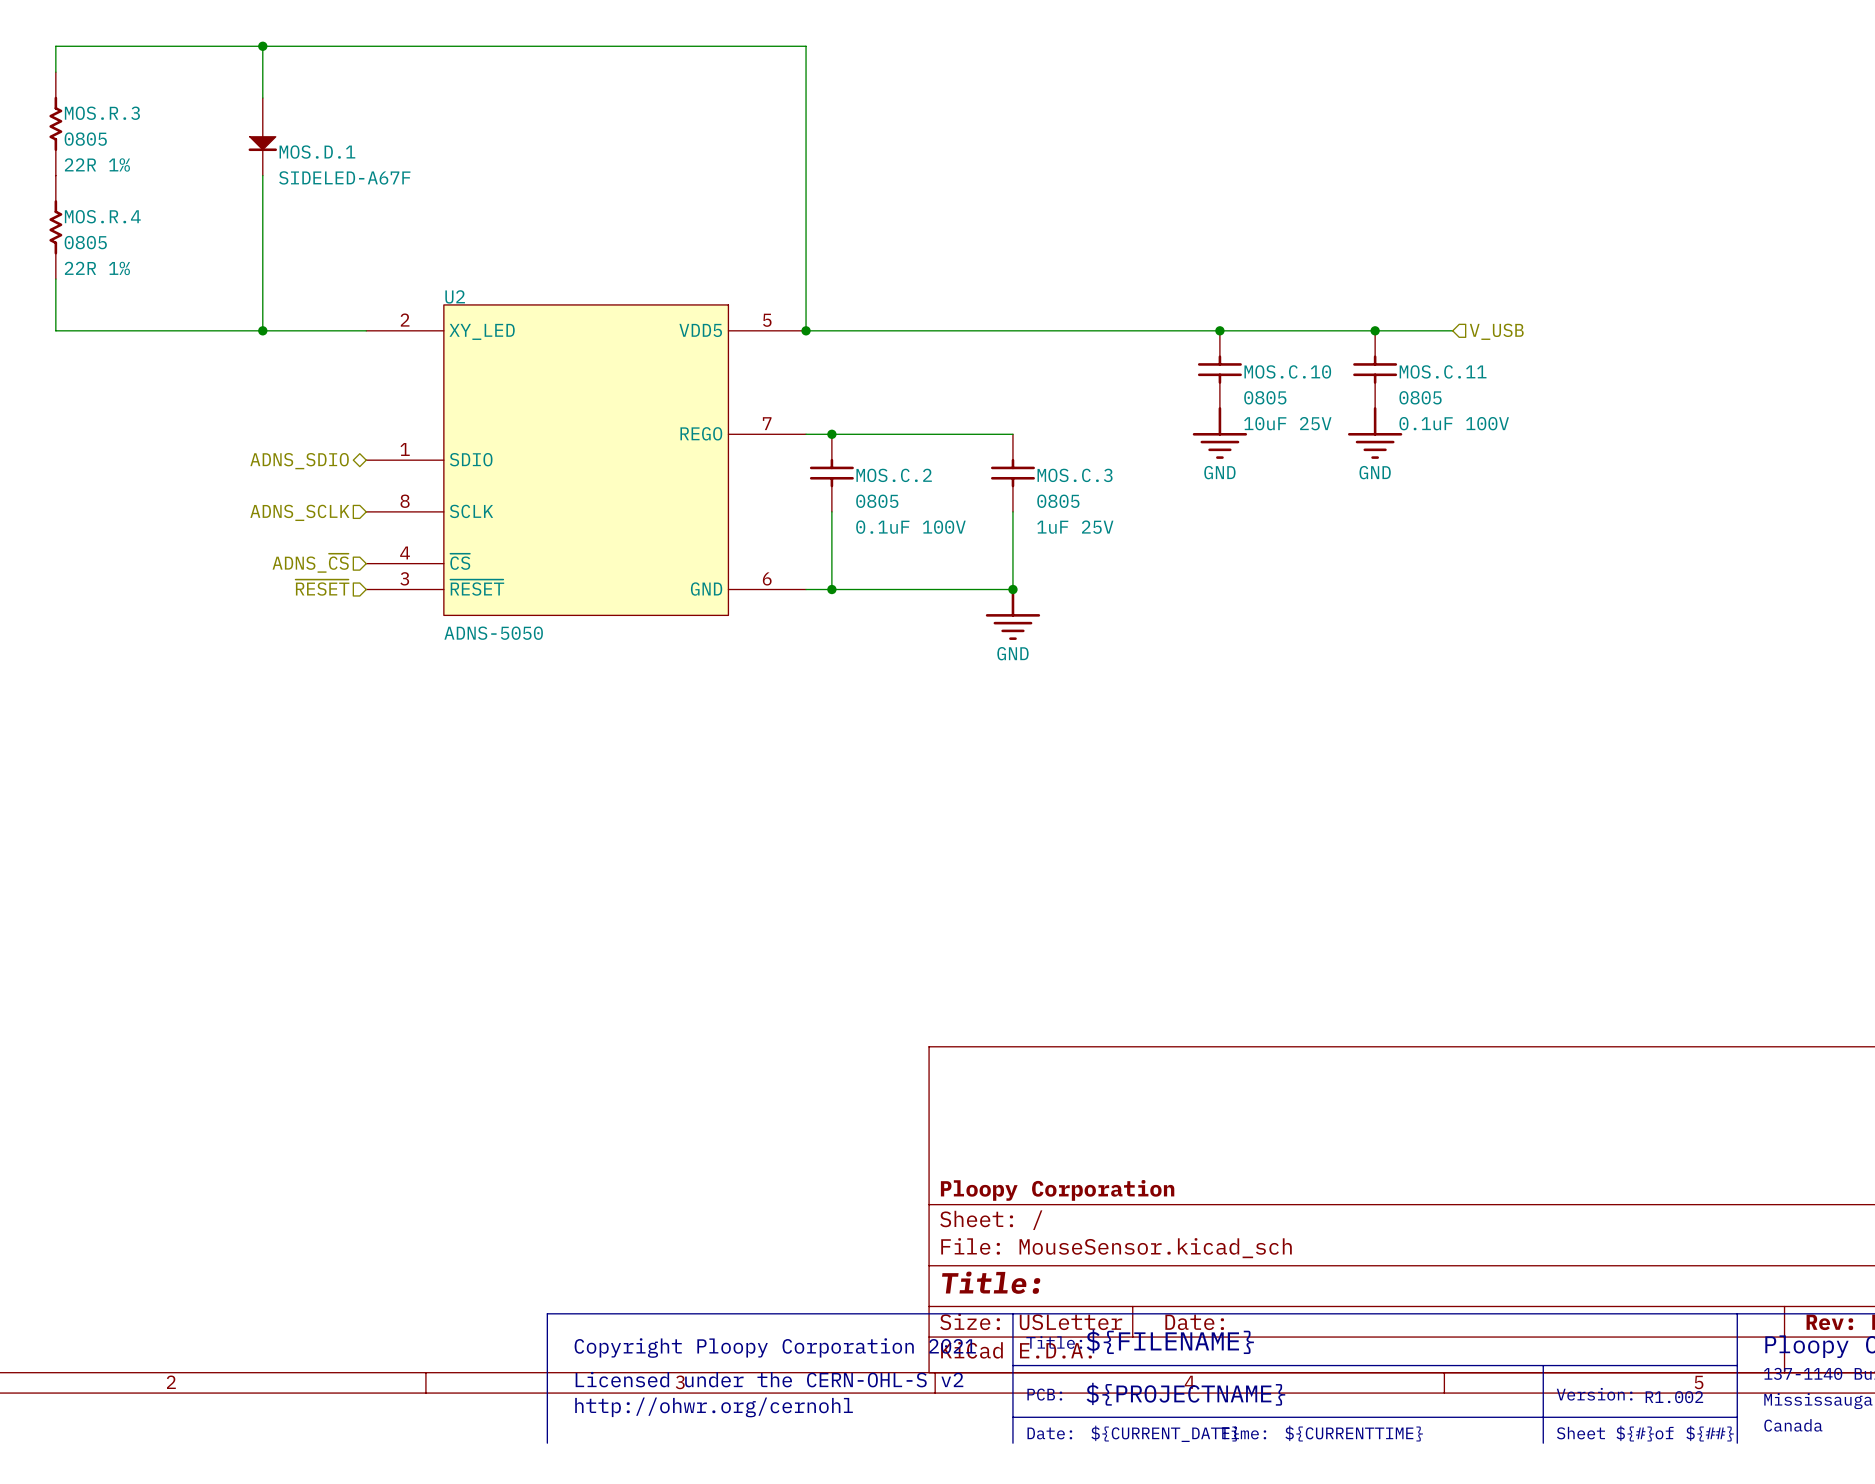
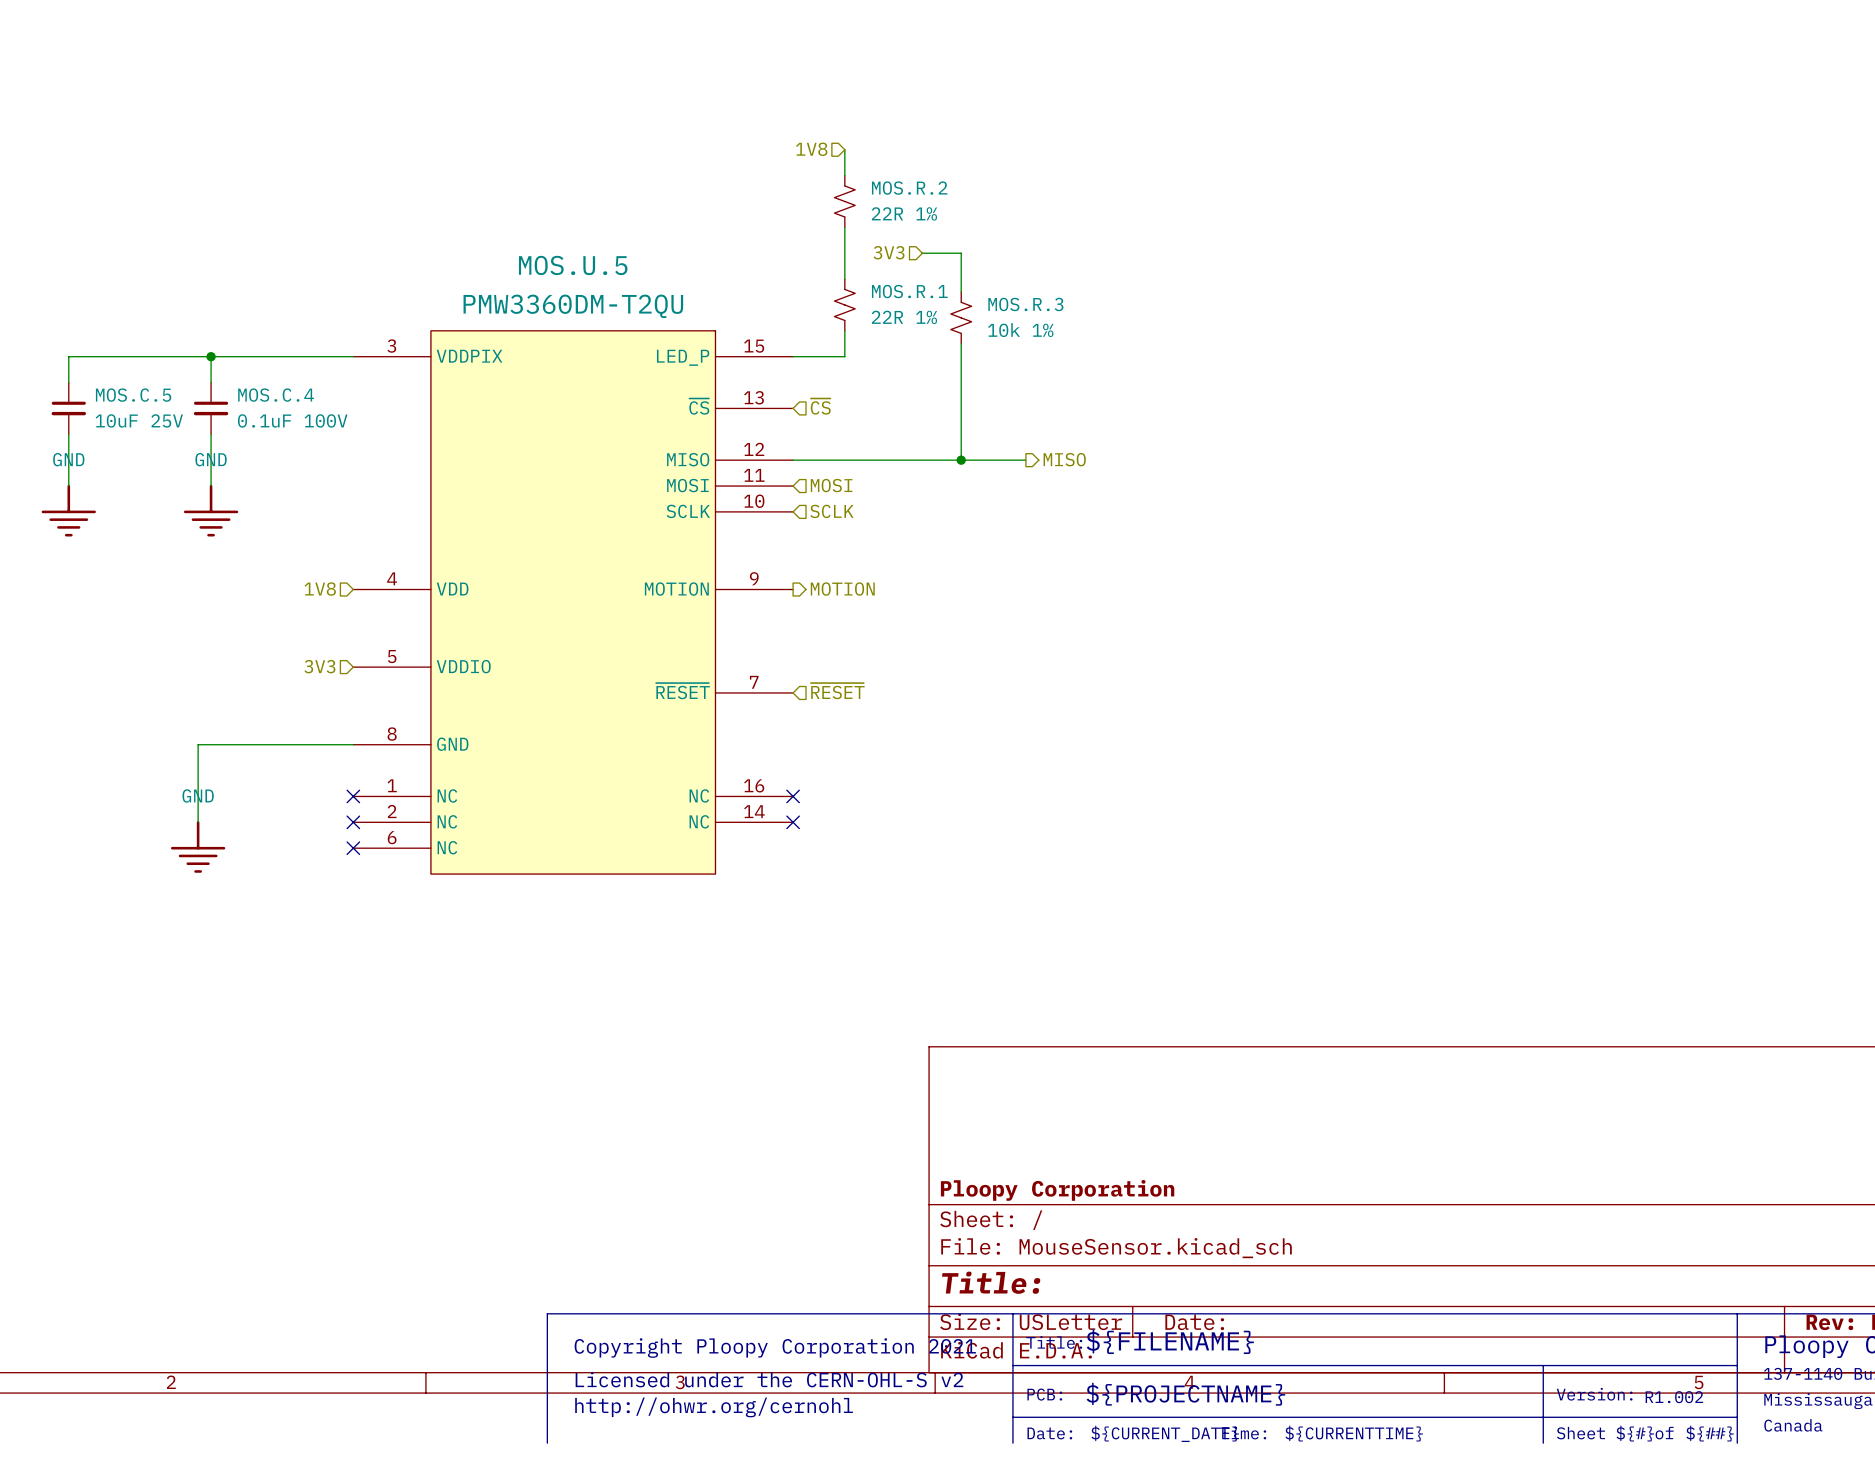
wire: (262, 46) (262, 98) -> none
junction: (262, 46) -> none
MOS.R.3 symbol: [49, 72, 63, 176] -> [950, 292, 972, 344]
wire: (55, 72) (55, 46) (806, 46) (806, 330) (1452, 330) -> none
MOS.D.1: SIDELED-A67F (262, 136) -> none
MOS.R.3 value: 0805 (85, 139) -> 10k 1% (1020, 330)
hierarchical label: none -> 1V8 (811, 149)
wire: none -> (844, 149) (844, 175)
MOS.R.3 text: 22R 1% (97, 164) -> none
wire: (262, 175) (262, 330) -> none
MOS.R.2: none -> 22R 1% (844, 201)
MOS.R.4: 0805 (55, 227) -> none
wire: none -> (844, 227) (844, 279)
hierarchical label: none -> 3V3 (889, 252)
wire: none -> (922, 253) (961, 253) (961, 292)
wire: (55, 279) (55, 330) (366, 330) -> none
MOS.R.1: none -> 22R 1% (844, 304)
junction position: (262, 330) -> (211, 356)
junction: (806, 330) -> none
wire: none -> (844, 330) (844, 356) (793, 356)
junction: (1219, 330) -> none
junction: (1375, 330) -> none
hierarchical label: V_USB (1496, 331) -> none
wire: none -> (961, 343) (961, 460)
wire: none -> (211, 356) (211, 382)
wire: none -> (353, 356) (68, 356) (68, 382)
MOS.C.10: 0805 (1219, 369) -> none
MOS.C.11: 0805 (1375, 369) -> none
hierarchical label: none -> ~{CS} (820, 406)
MOS.C.5: none -> 10uF 25V (68, 408)
MOS.C.4: none -> 0.1uF 100V (211, 408)
power symbol: GND (1219, 433) -> none
power symbol: GND (1375, 433) -> none
wire: none -> (68, 434) (68, 486)
wire: none -> (211, 434) (211, 486)
wire: (806, 434) (1012, 434) -> none
junction: (831, 434) -> none
hierarchical label: none -> MISO (1064, 459)
U2: ADNS-5050 (586, 460) -> none
wire: none -> (793, 460) (1025, 460)
junction: none -> (961, 460)
hierarchical label: ADNS_SDIO (299, 461) -> none
MOS.C.2: 0805 (831, 473) -> none
MOS.C.3: 0805 (1012, 473) -> none
hierarchical label: none -> MOSI (831, 485)
power symbol: none -> GND (68, 510)
power symbol: none -> GND (211, 510)
wire: (831, 511) (831, 589) -> none
hierarchical label: none -> SCLK (831, 511)
wire: (1012, 511) (1012, 589) (806, 589) -> none
hierarchical label: ADNS_SCLK (299, 512) -> none
hierarchical label: ADNS_~{CS} (310, 563) -> none
hierarchical label: ~{RESET} (322, 587) -> none
hierarchical label: none -> 1V8 (320, 589)
junction: (831, 589) -> none
hierarchical label: none -> MOTION (842, 589)
junction: (1012, 589) -> none
MOS.U.5: none -> PMW3360DM-T2QU (573, 602)
power symbol: GND (1012, 614) -> none
hierarchical label: none -> 3V3 (319, 666)
hierarchical label: none -> ~{RESET} (837, 691)
wire: none -> (353, 744) (198, 744) (198, 822)
no-connect mark: none -> (353, 796)
no-connect mark: none -> (793, 796)
no-connect mark: none -> (353, 822)
no-connect mark: none -> (793, 822)
power symbol: none -> GND (198, 846)
no-connect mark: none -> (353, 848)

